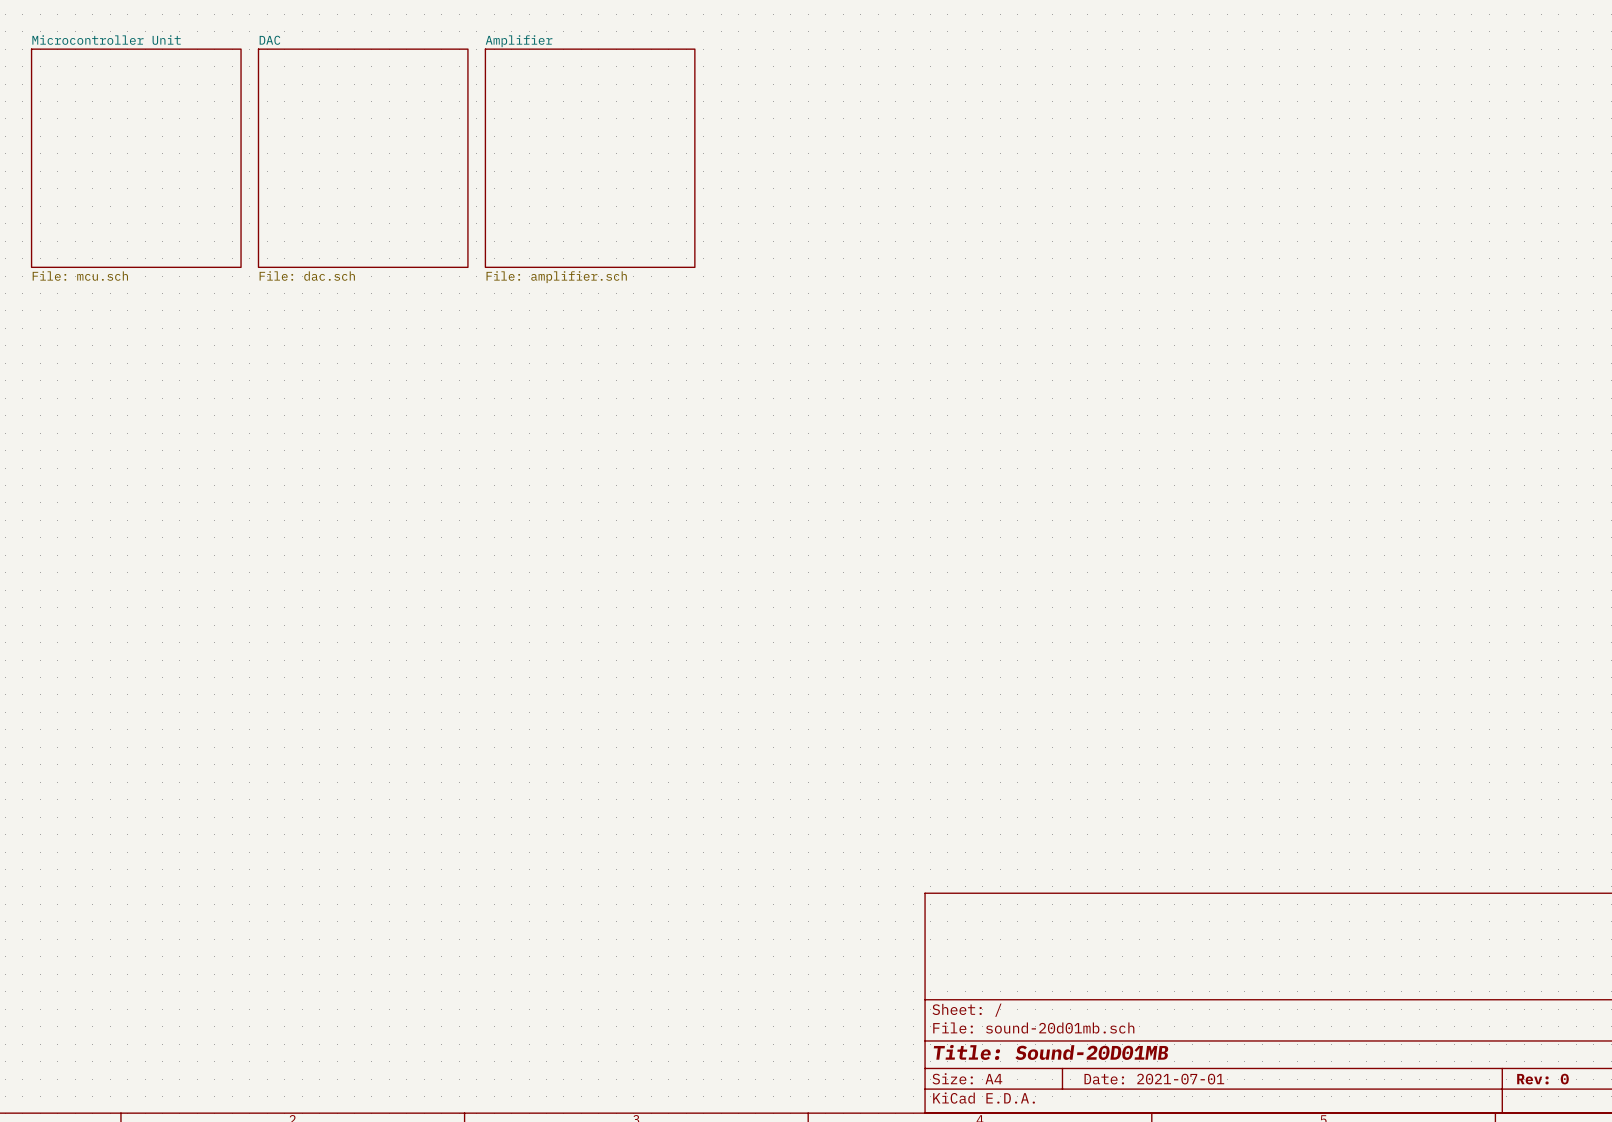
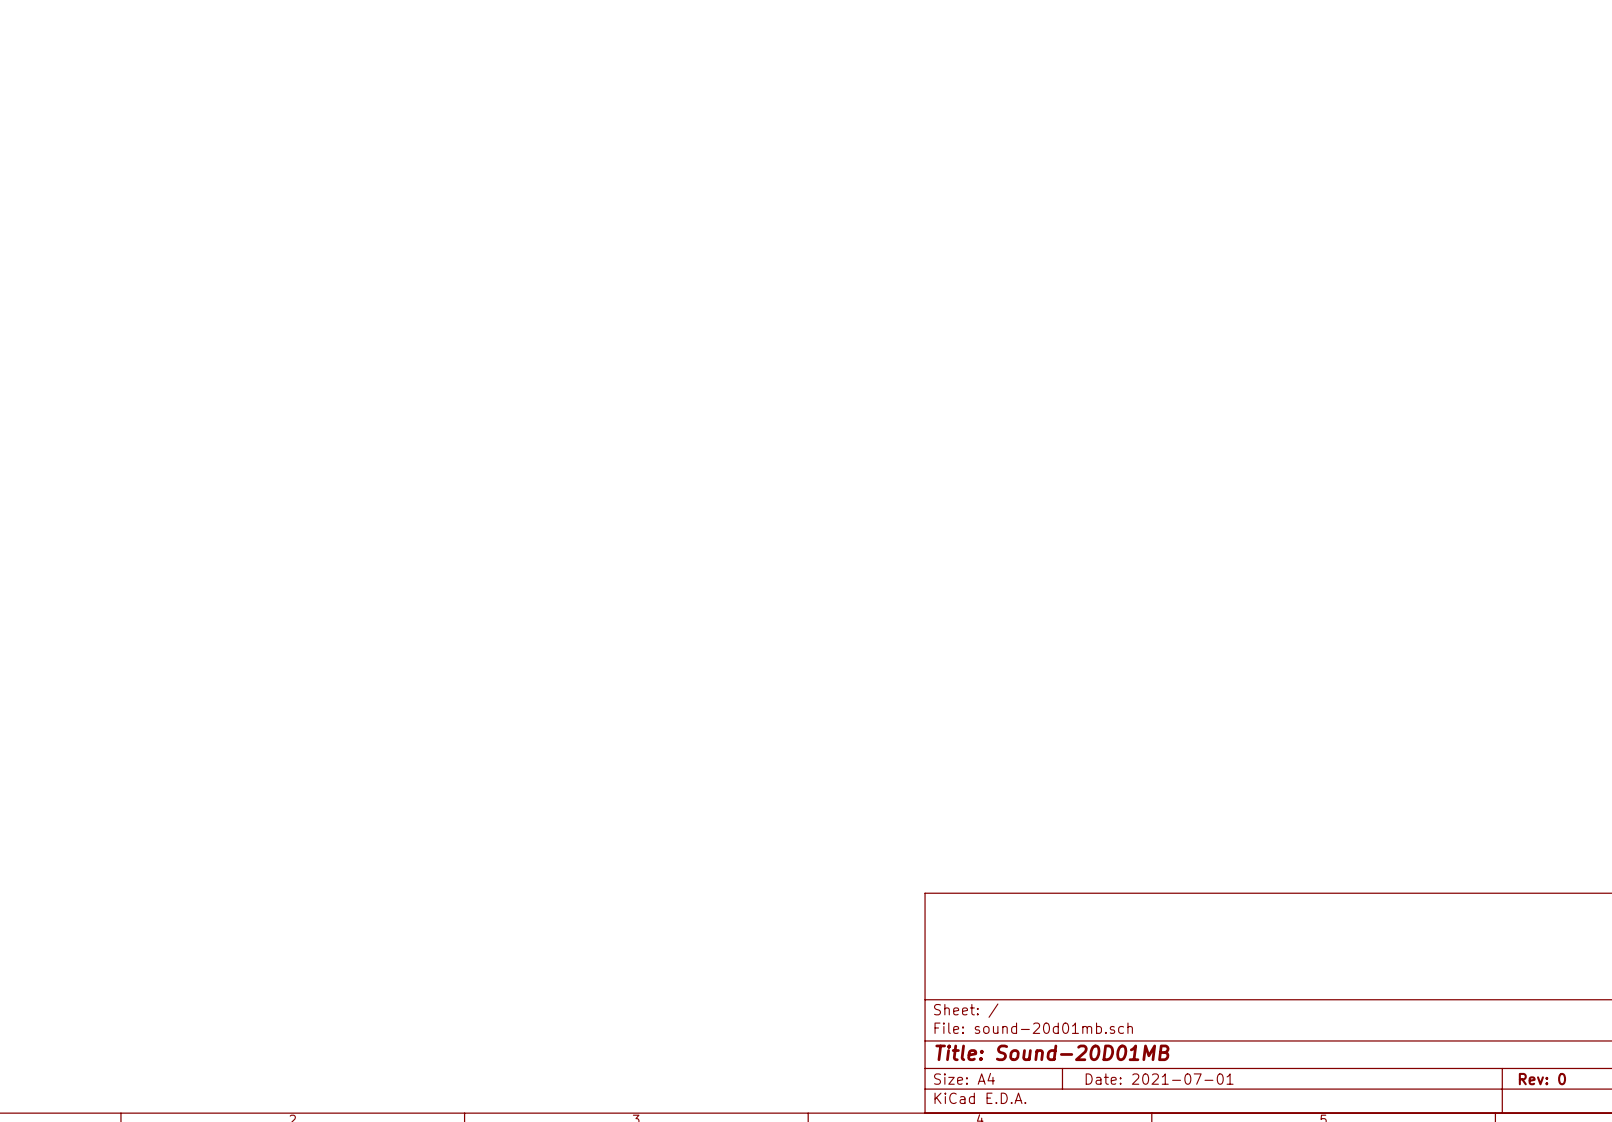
sheet Microcontroller Unit: File: mcu.sch (136, 158) -> none
sheet DAC: File: dac.sch (363, 158) -> none
sheet Amplifier: File: amplifier.sch (590, 158) -> none

